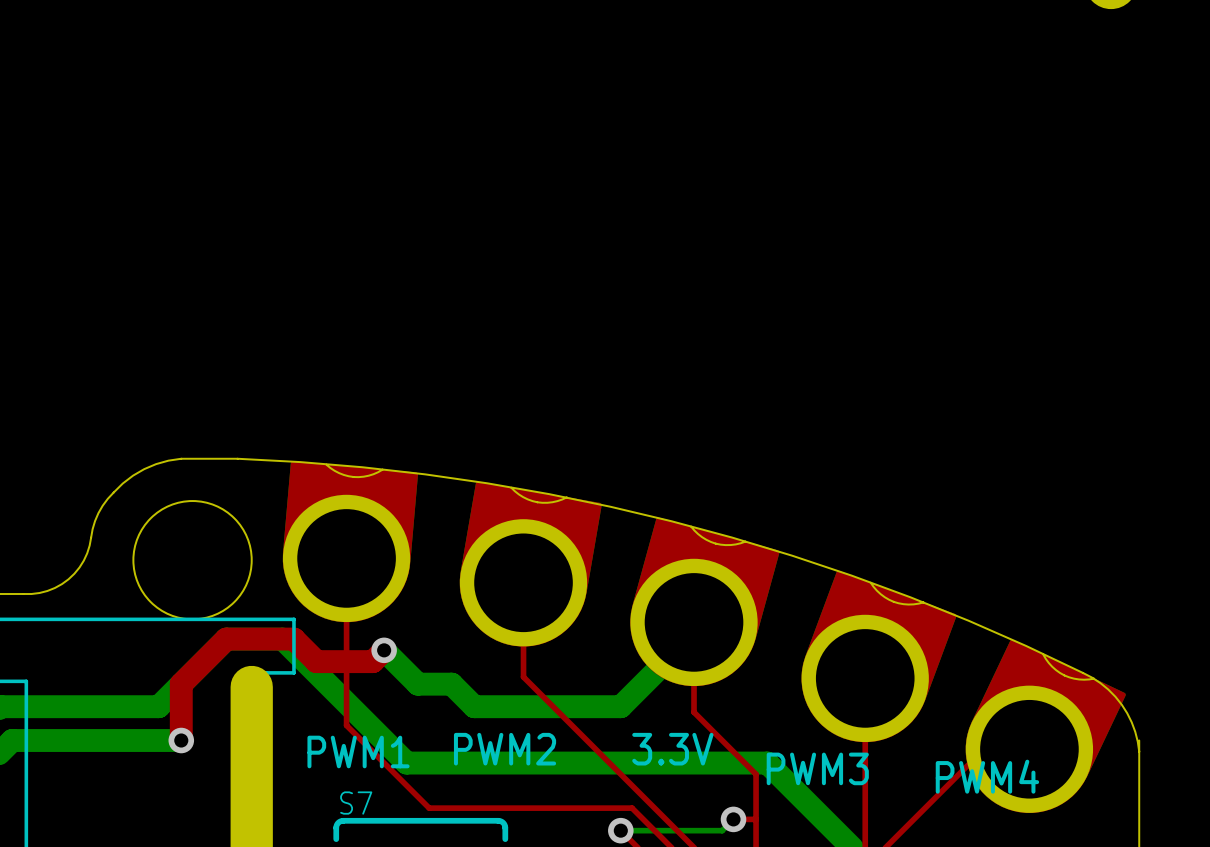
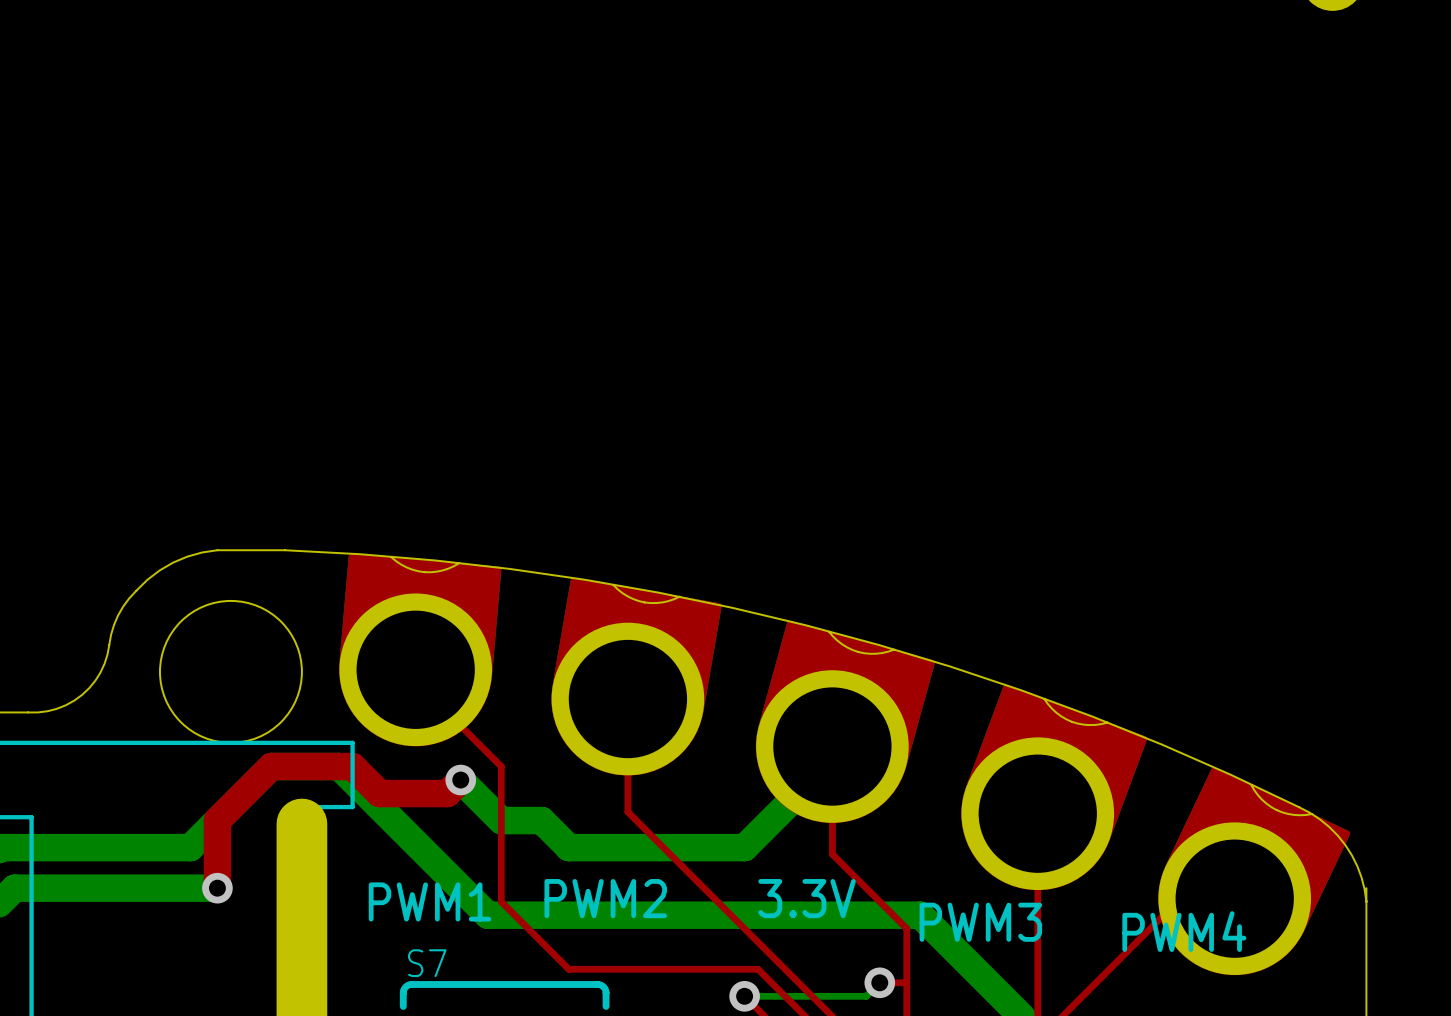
top track: (346, 567) (346, 725) (429, 808) (474, 808) -> (415, 680) (501, 766) (501, 901) (568, 969)

